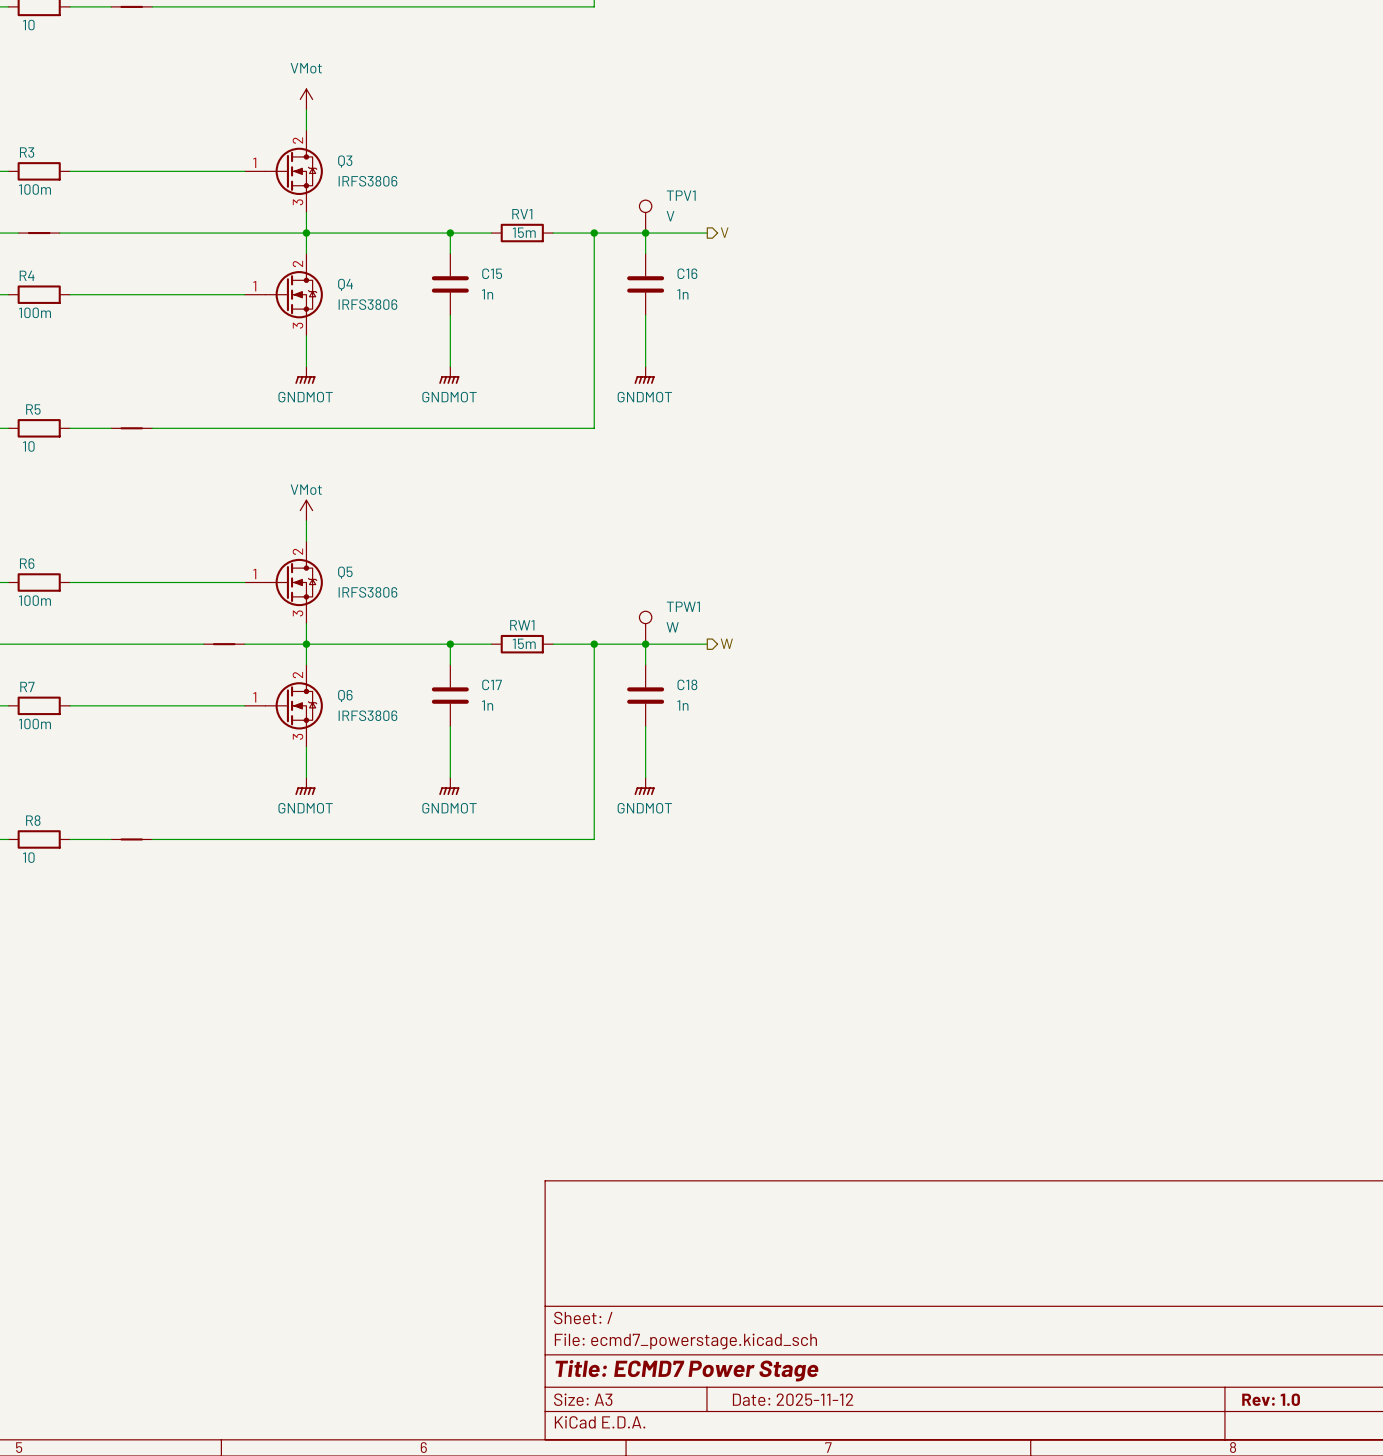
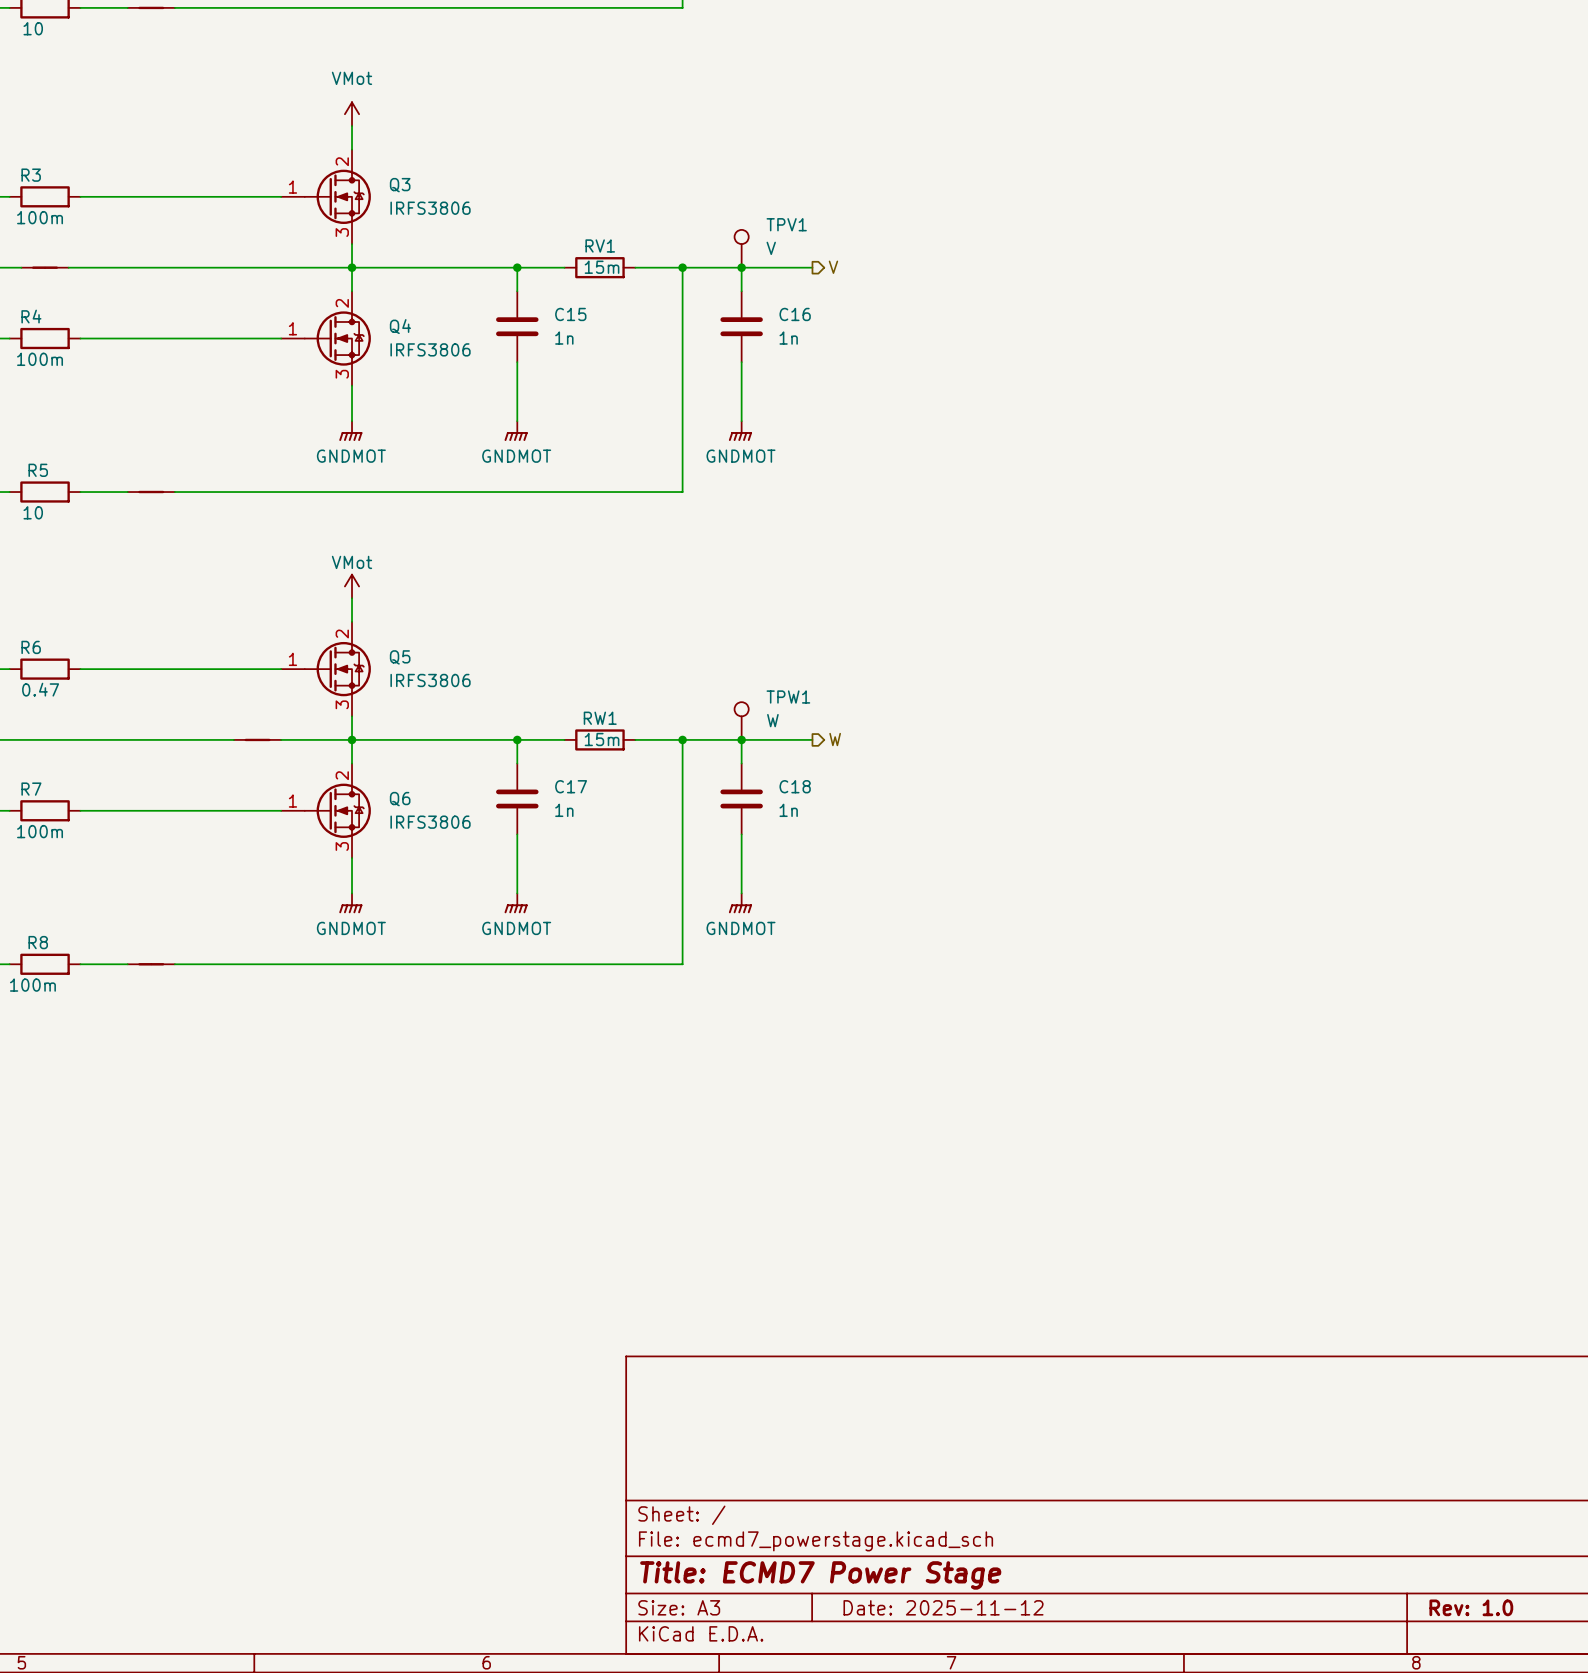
R6 value: 100m (34, 600) -> 0.47 (40, 689)
R8 value: 10 (28, 857) -> 100m (32, 985)

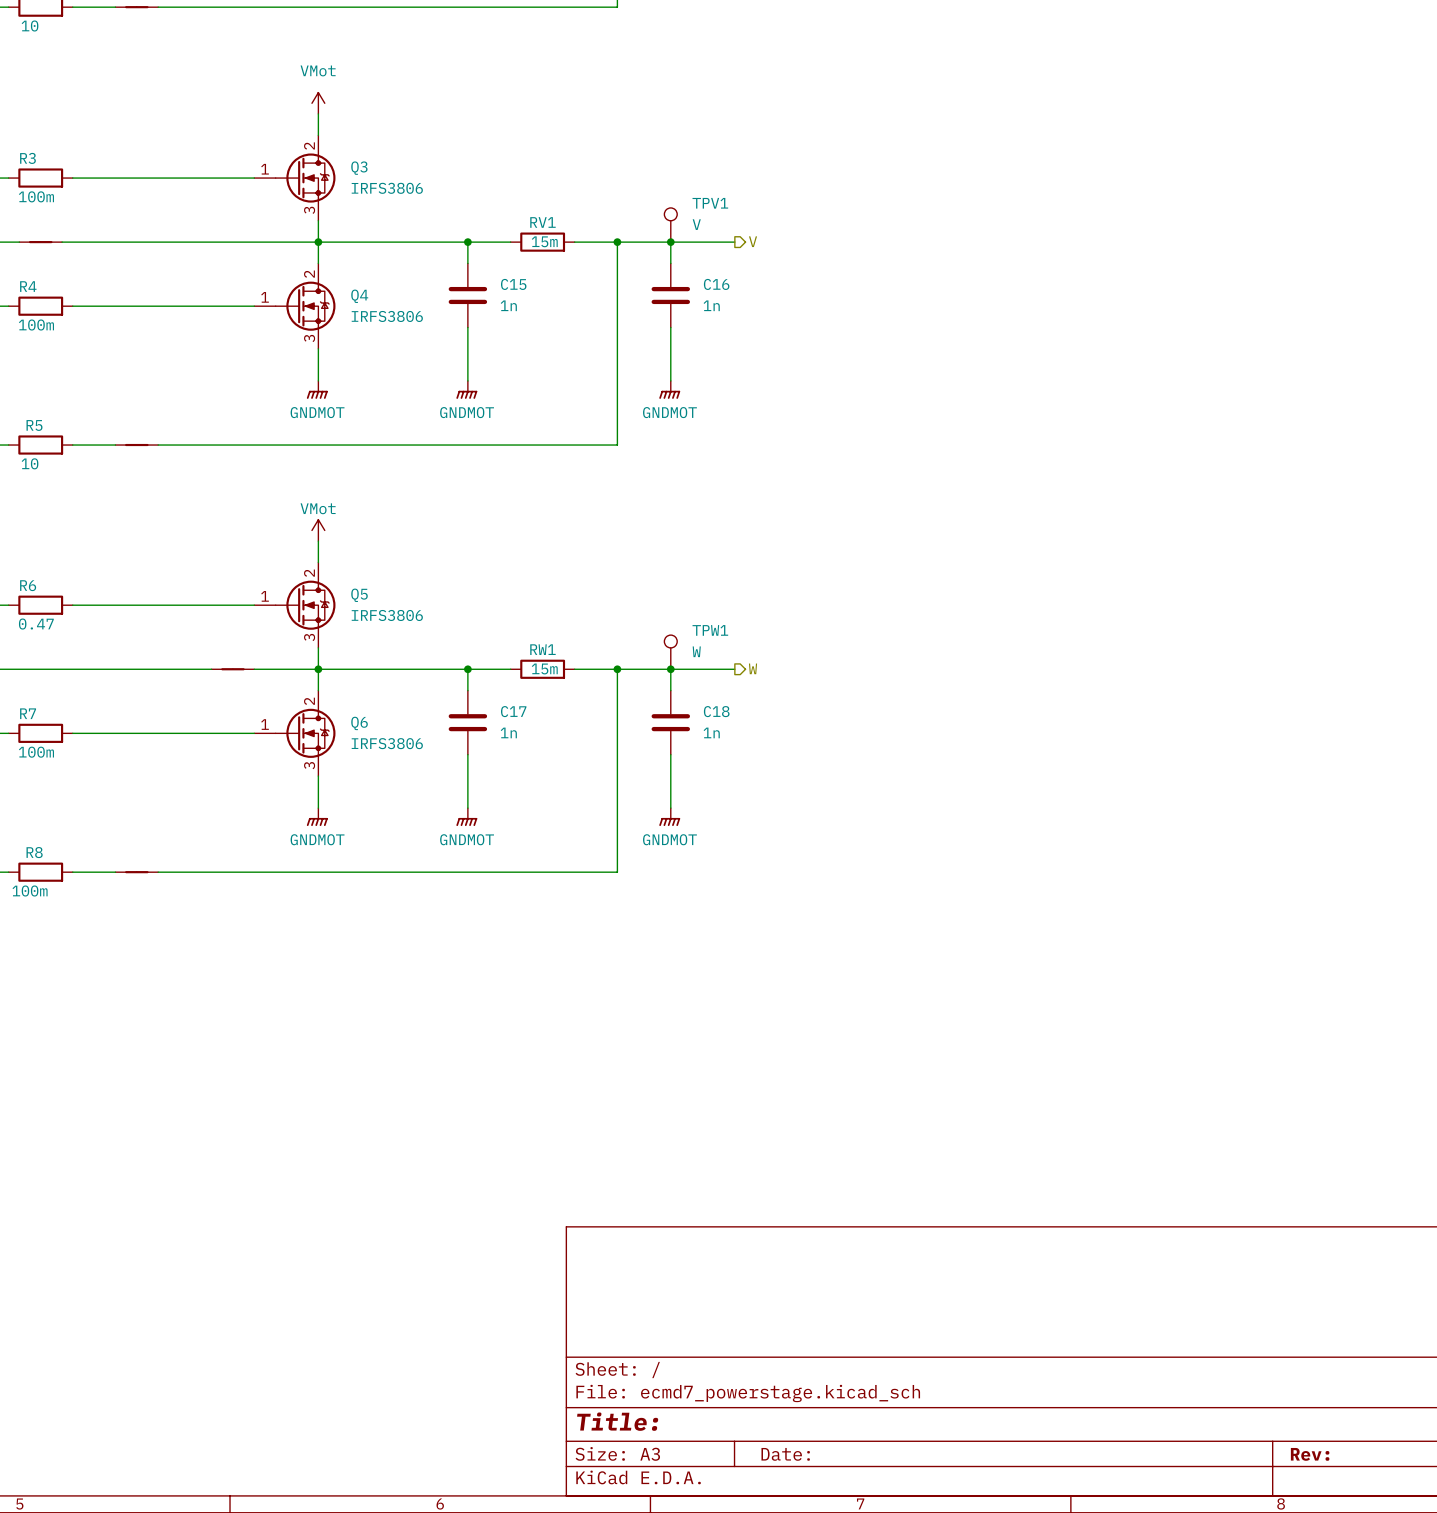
title block: Title: ECMD7 Power Stage (820, 1575) -> Title: (617, 1421)
title block: Date: 2025-11-12 (943, 1607) -> Date: (785, 1454)
title block: Rev: 1.0 (1471, 1607) -> Rev: (1310, 1454)

